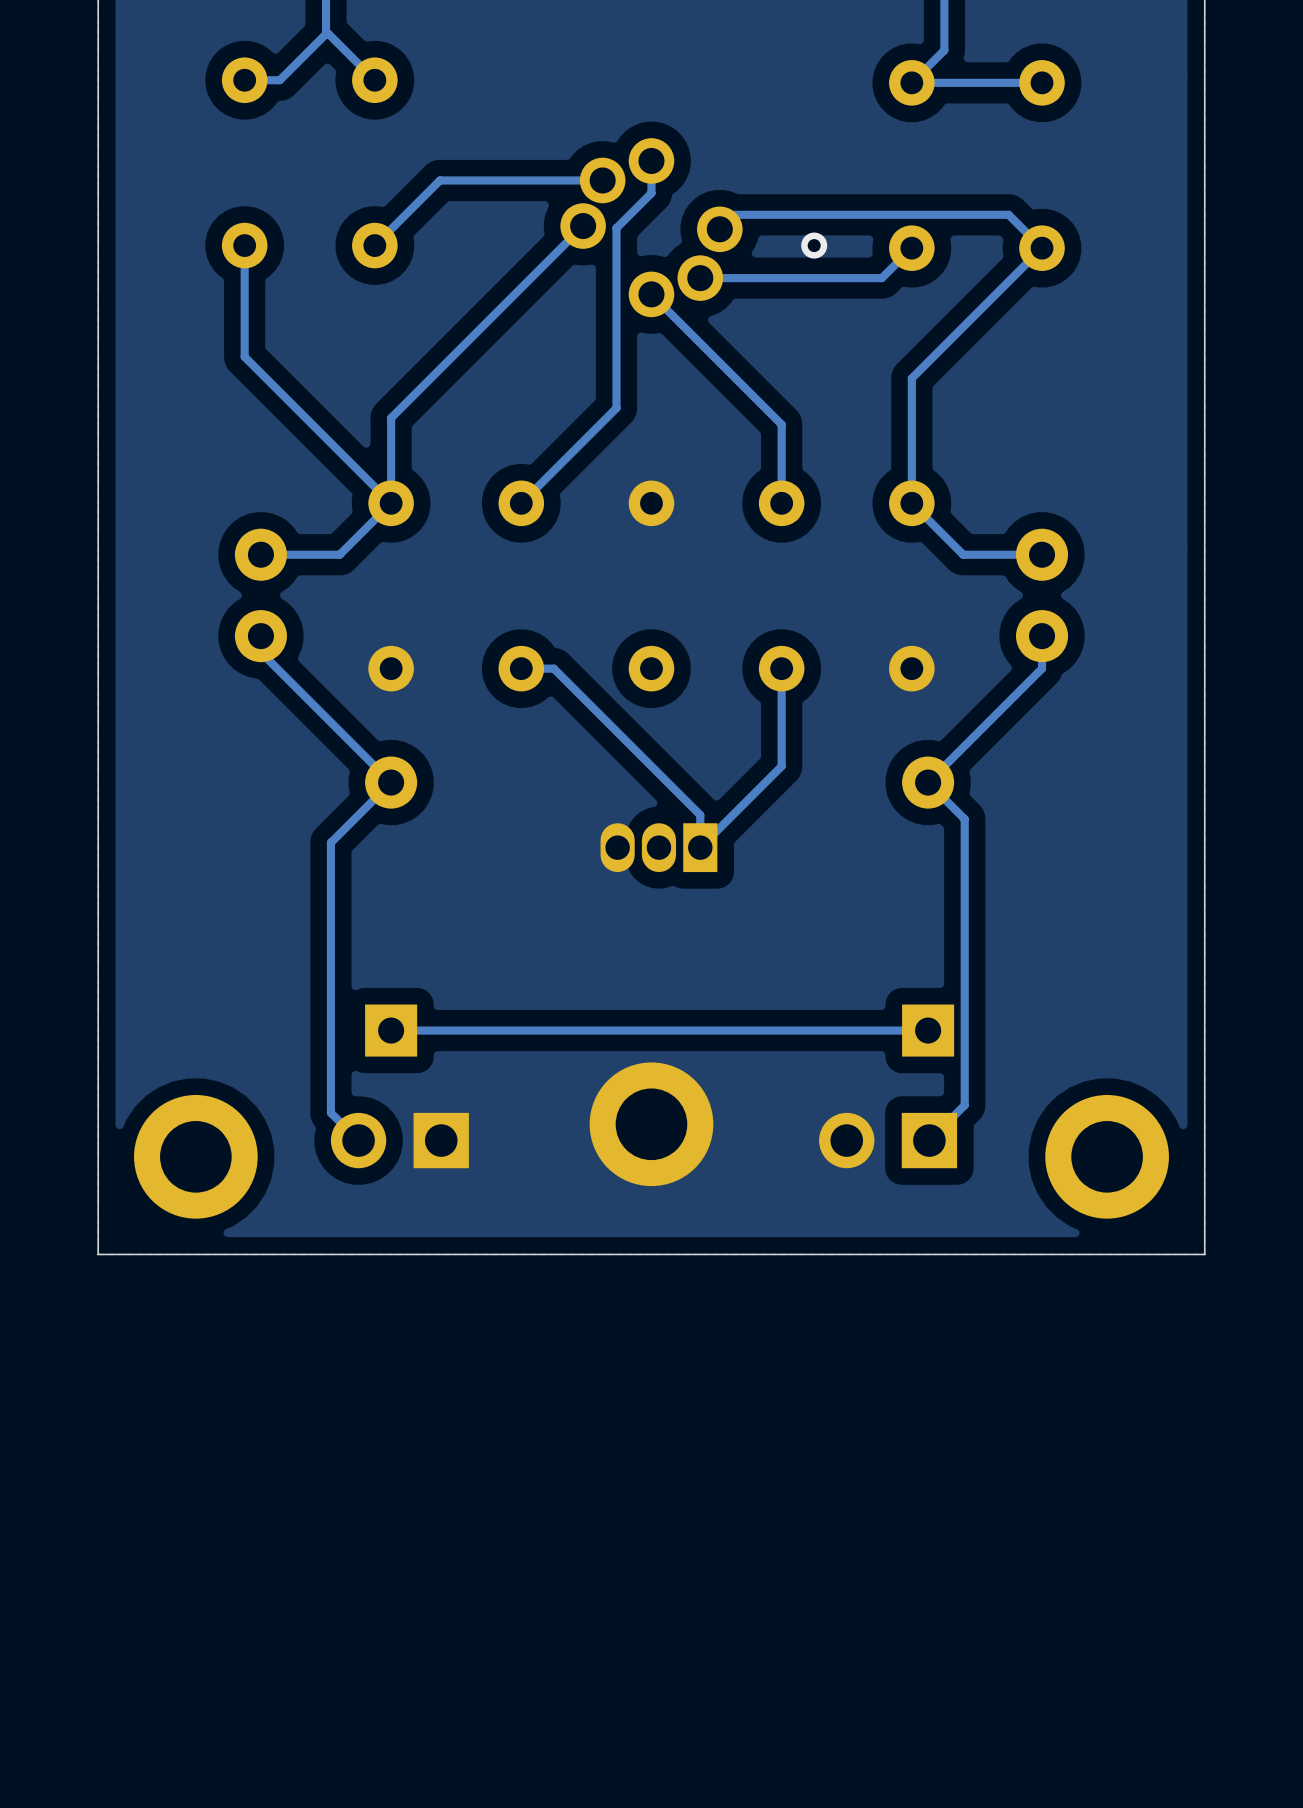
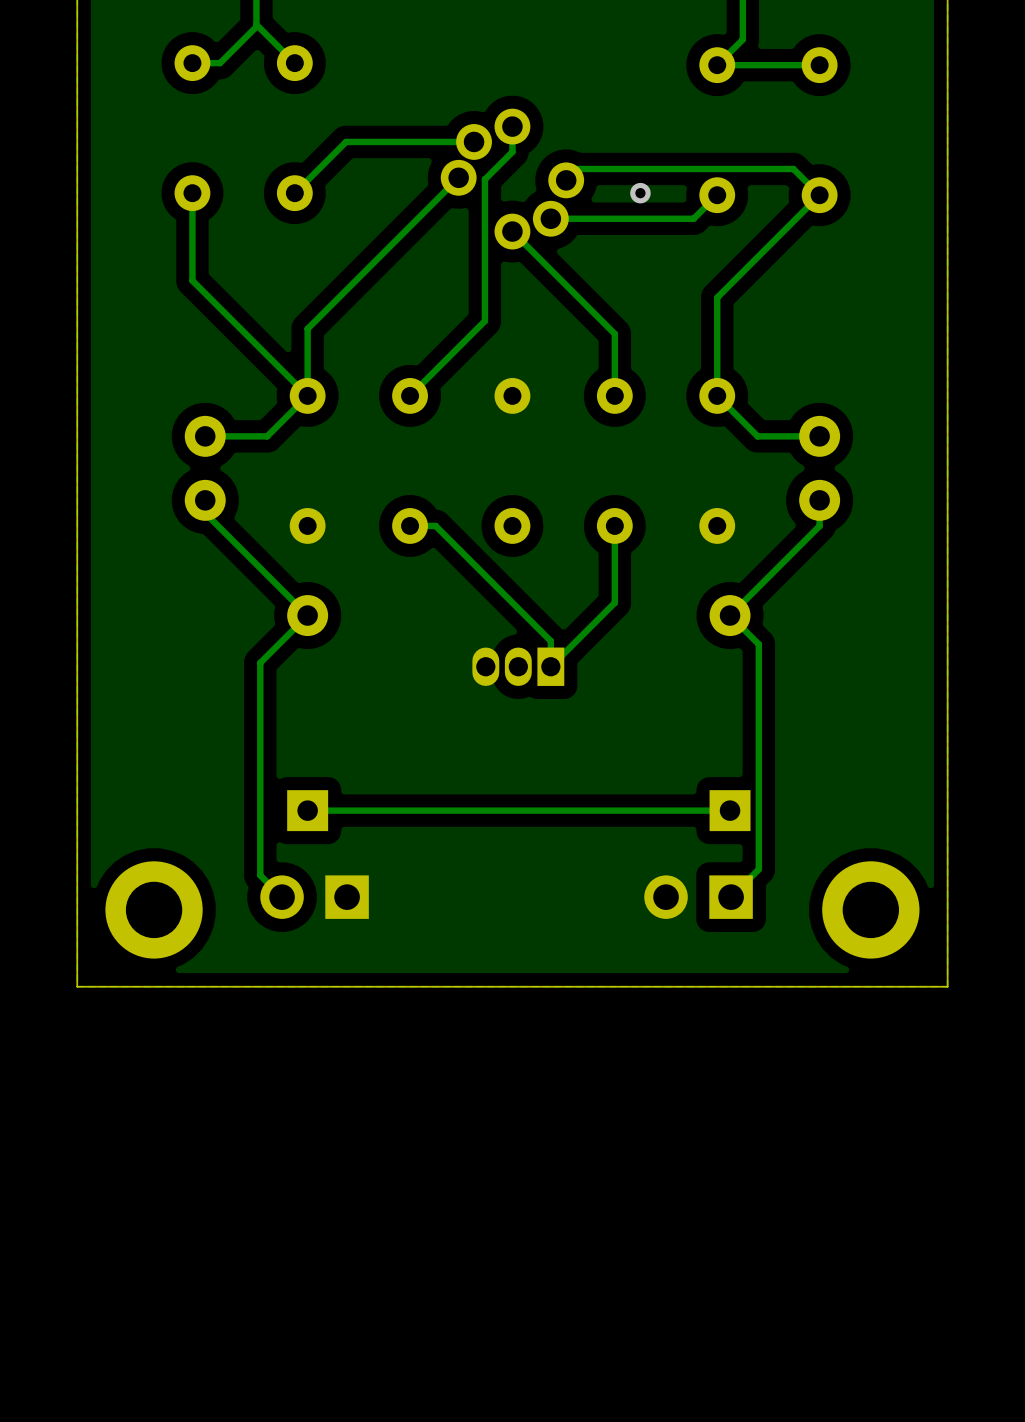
part: (651, 1124) -> none

